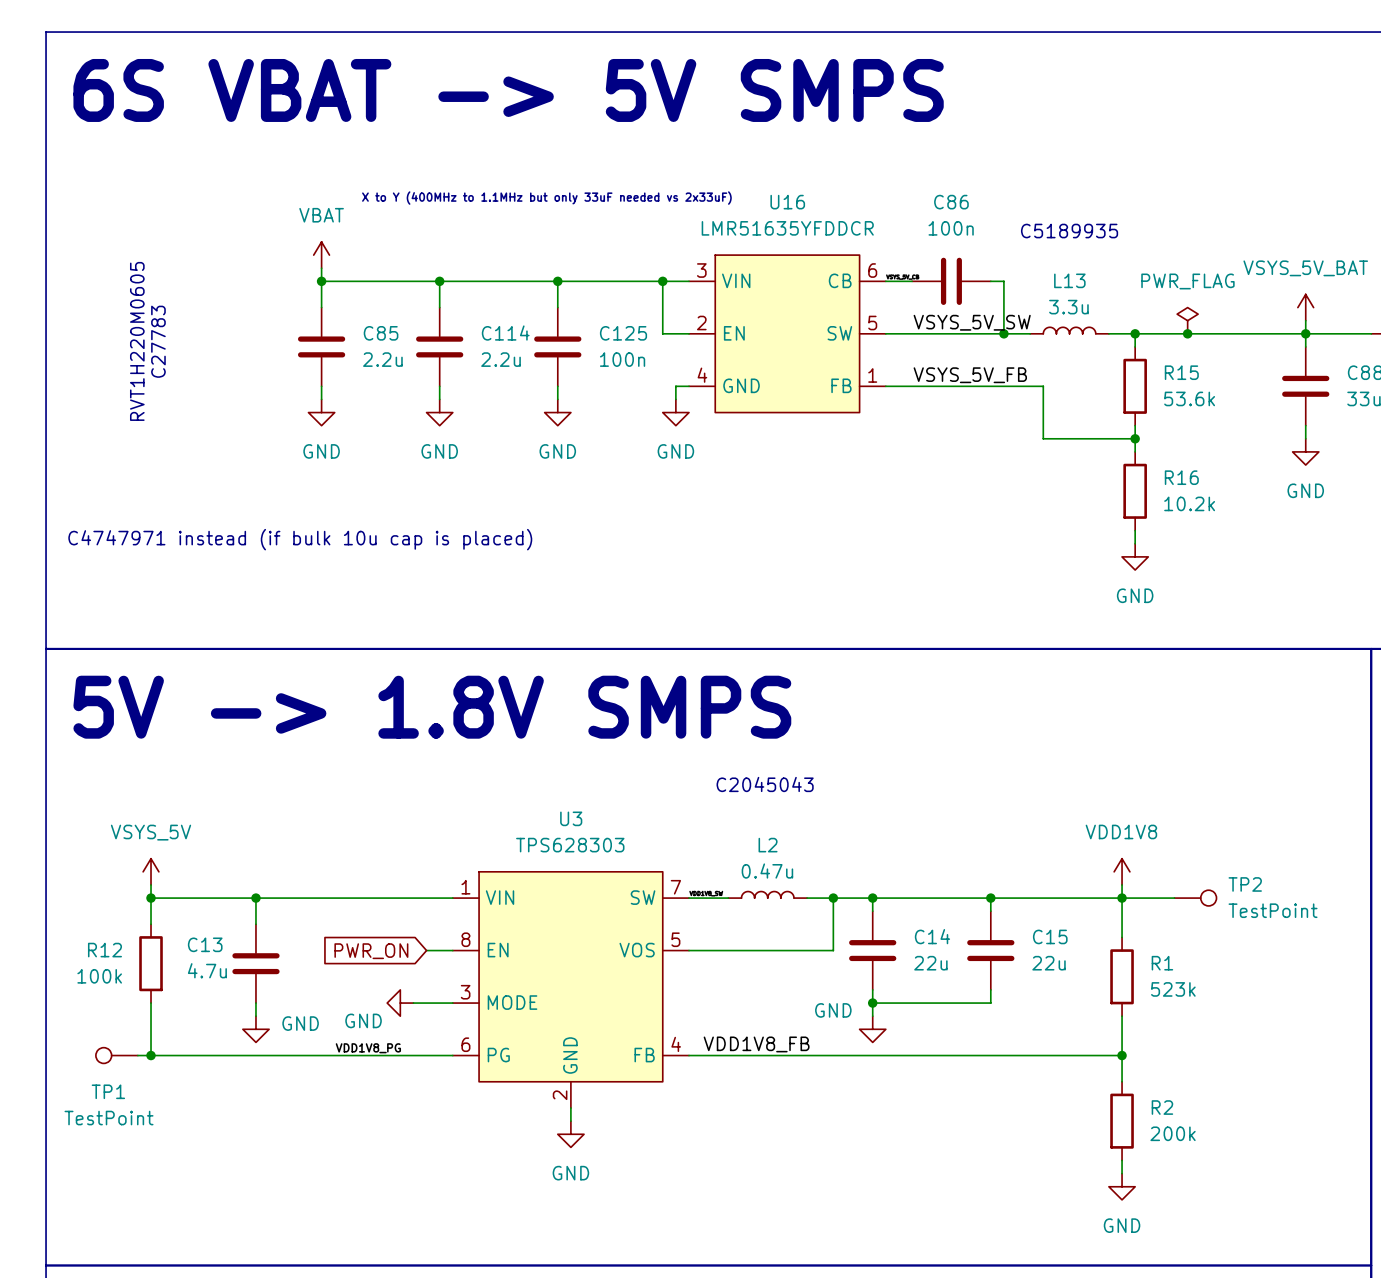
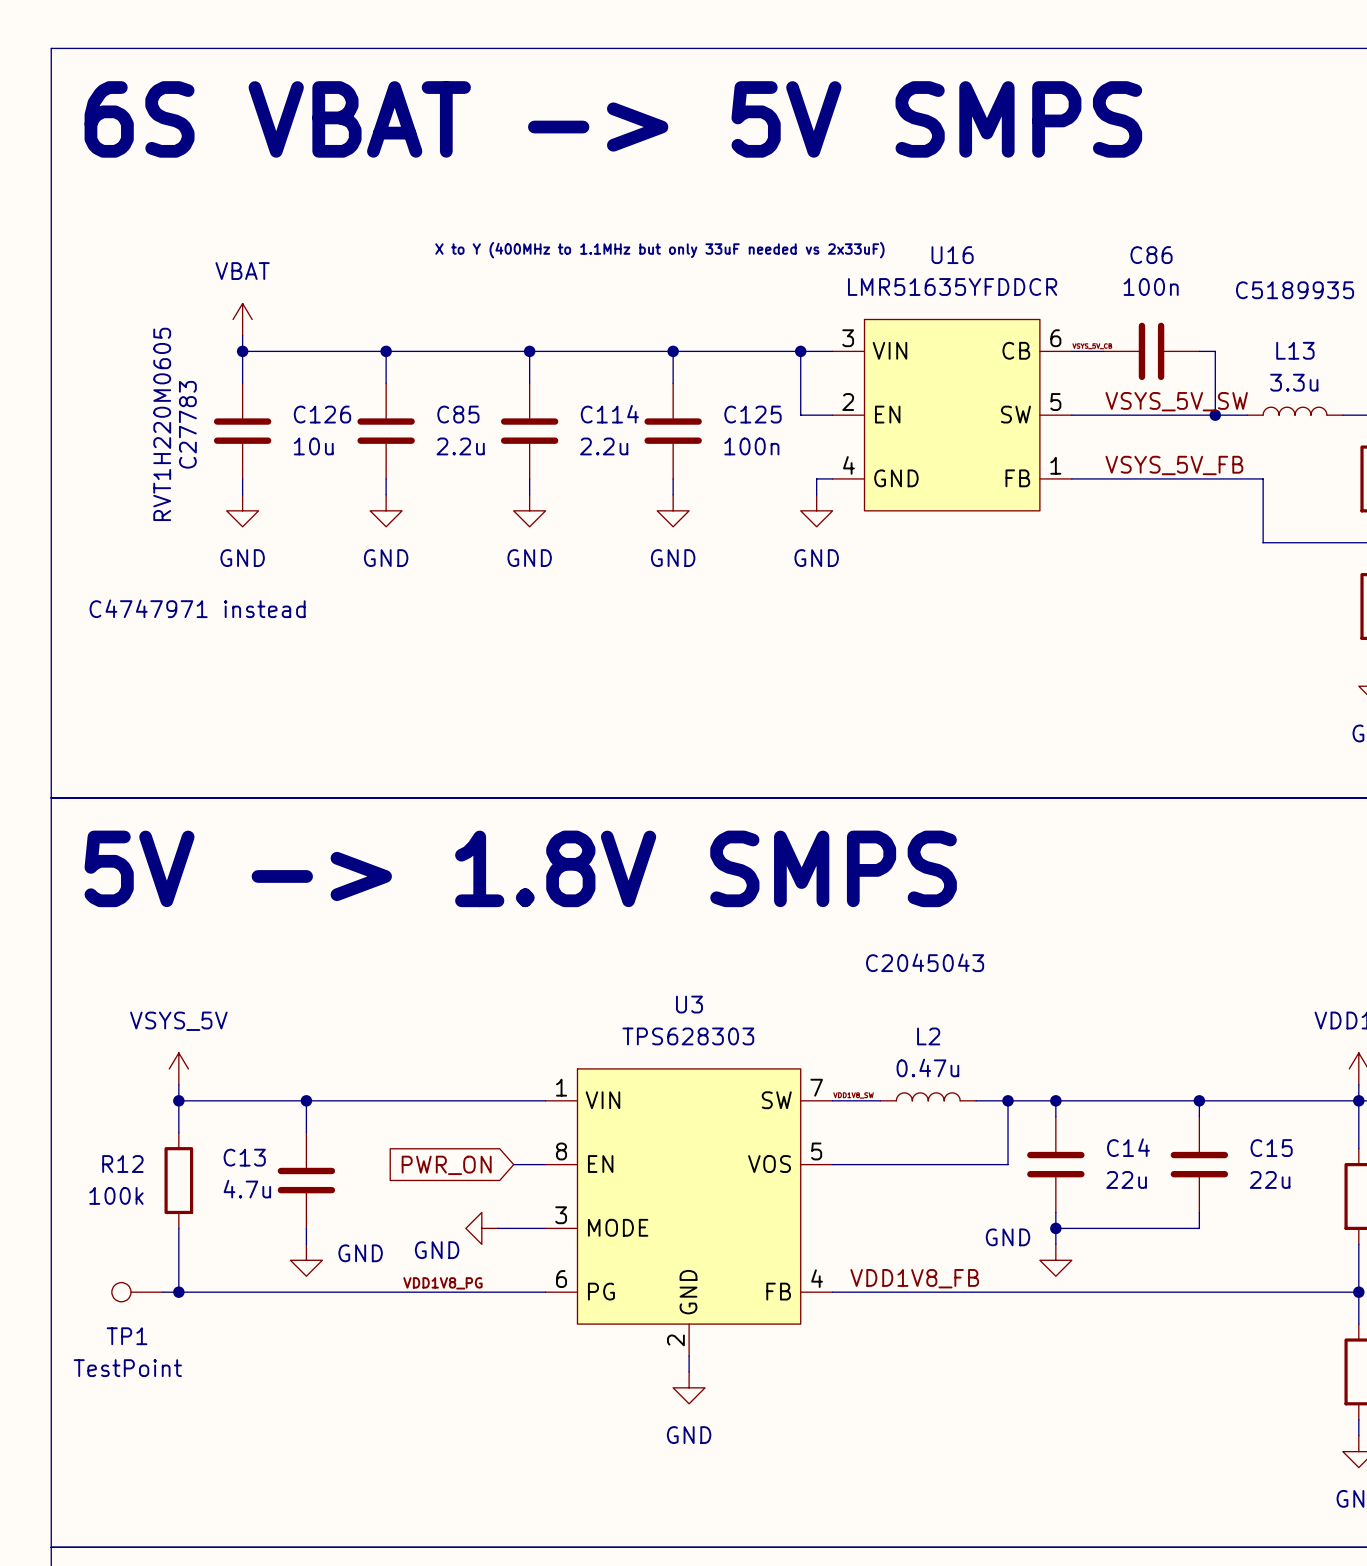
power symbol position: VBAT (321, 255) -> VBAT (242, 319)
wire: none -> (242, 335) (242, 383)
wire: (321, 268) (321, 281) -> (242, 351) (386, 351)
junction: none -> (242, 351)
C126: none -> 10u (242, 431)
wire: none -> (242, 478) (242, 494)
power symbol: none -> GND (242, 510)
text: none -> C4747971 instead (197, 608)
text: C4747971 instead (if bulk 10u cap is placed) (300, 539) -> none

